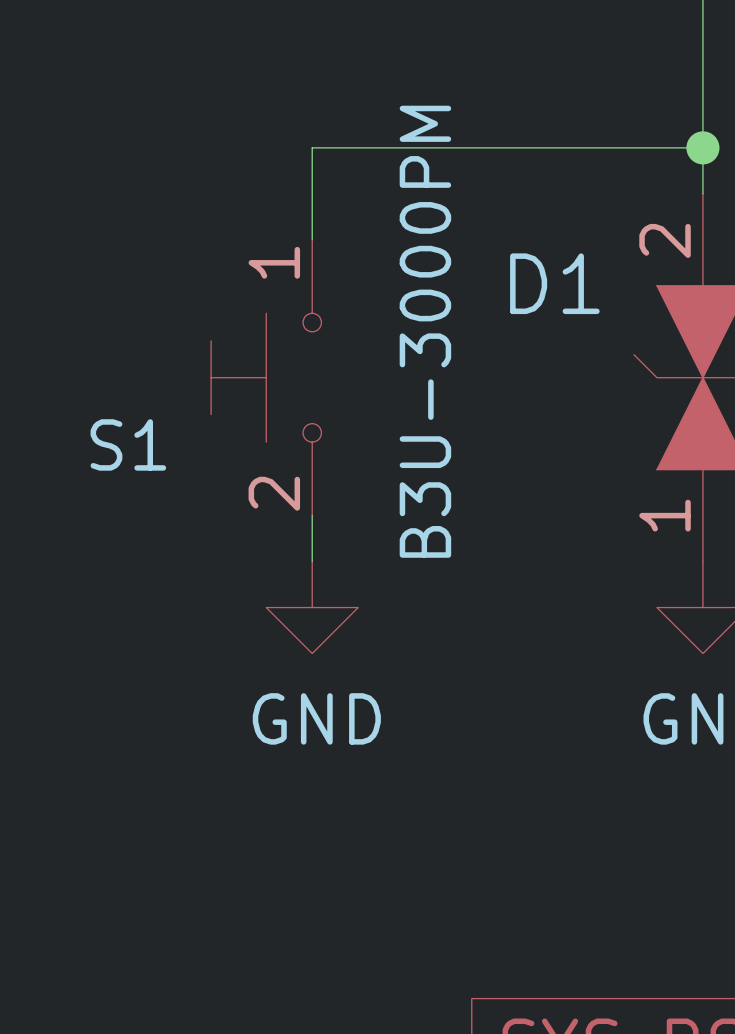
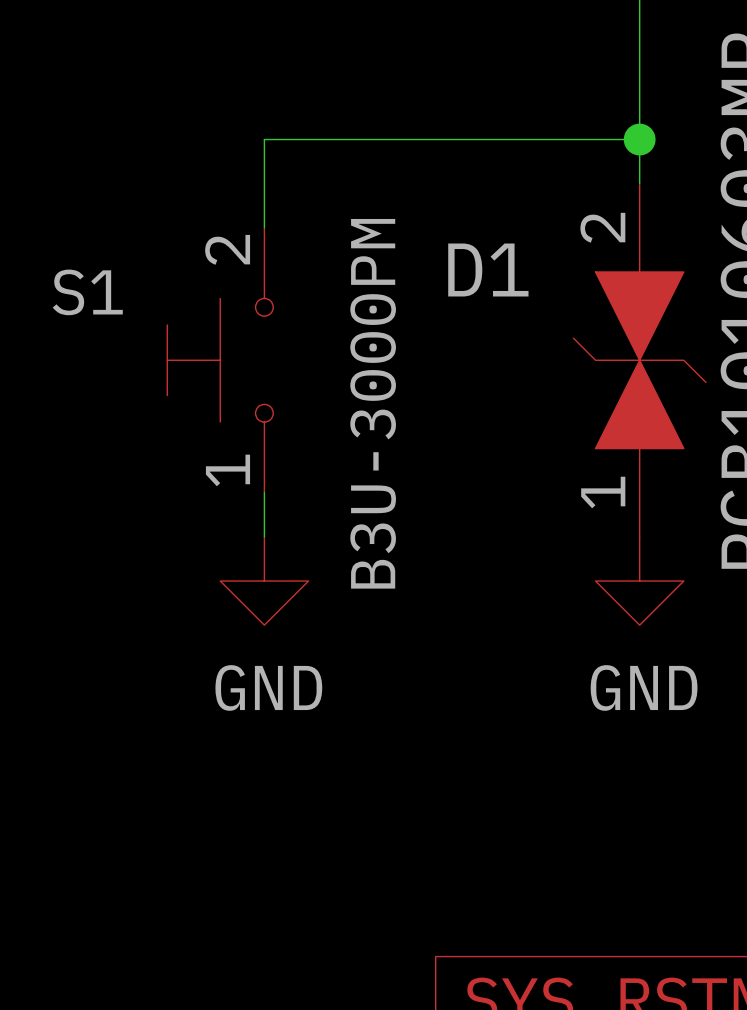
S1 flip: as is (266, 377) -> up-down (220, 360)

